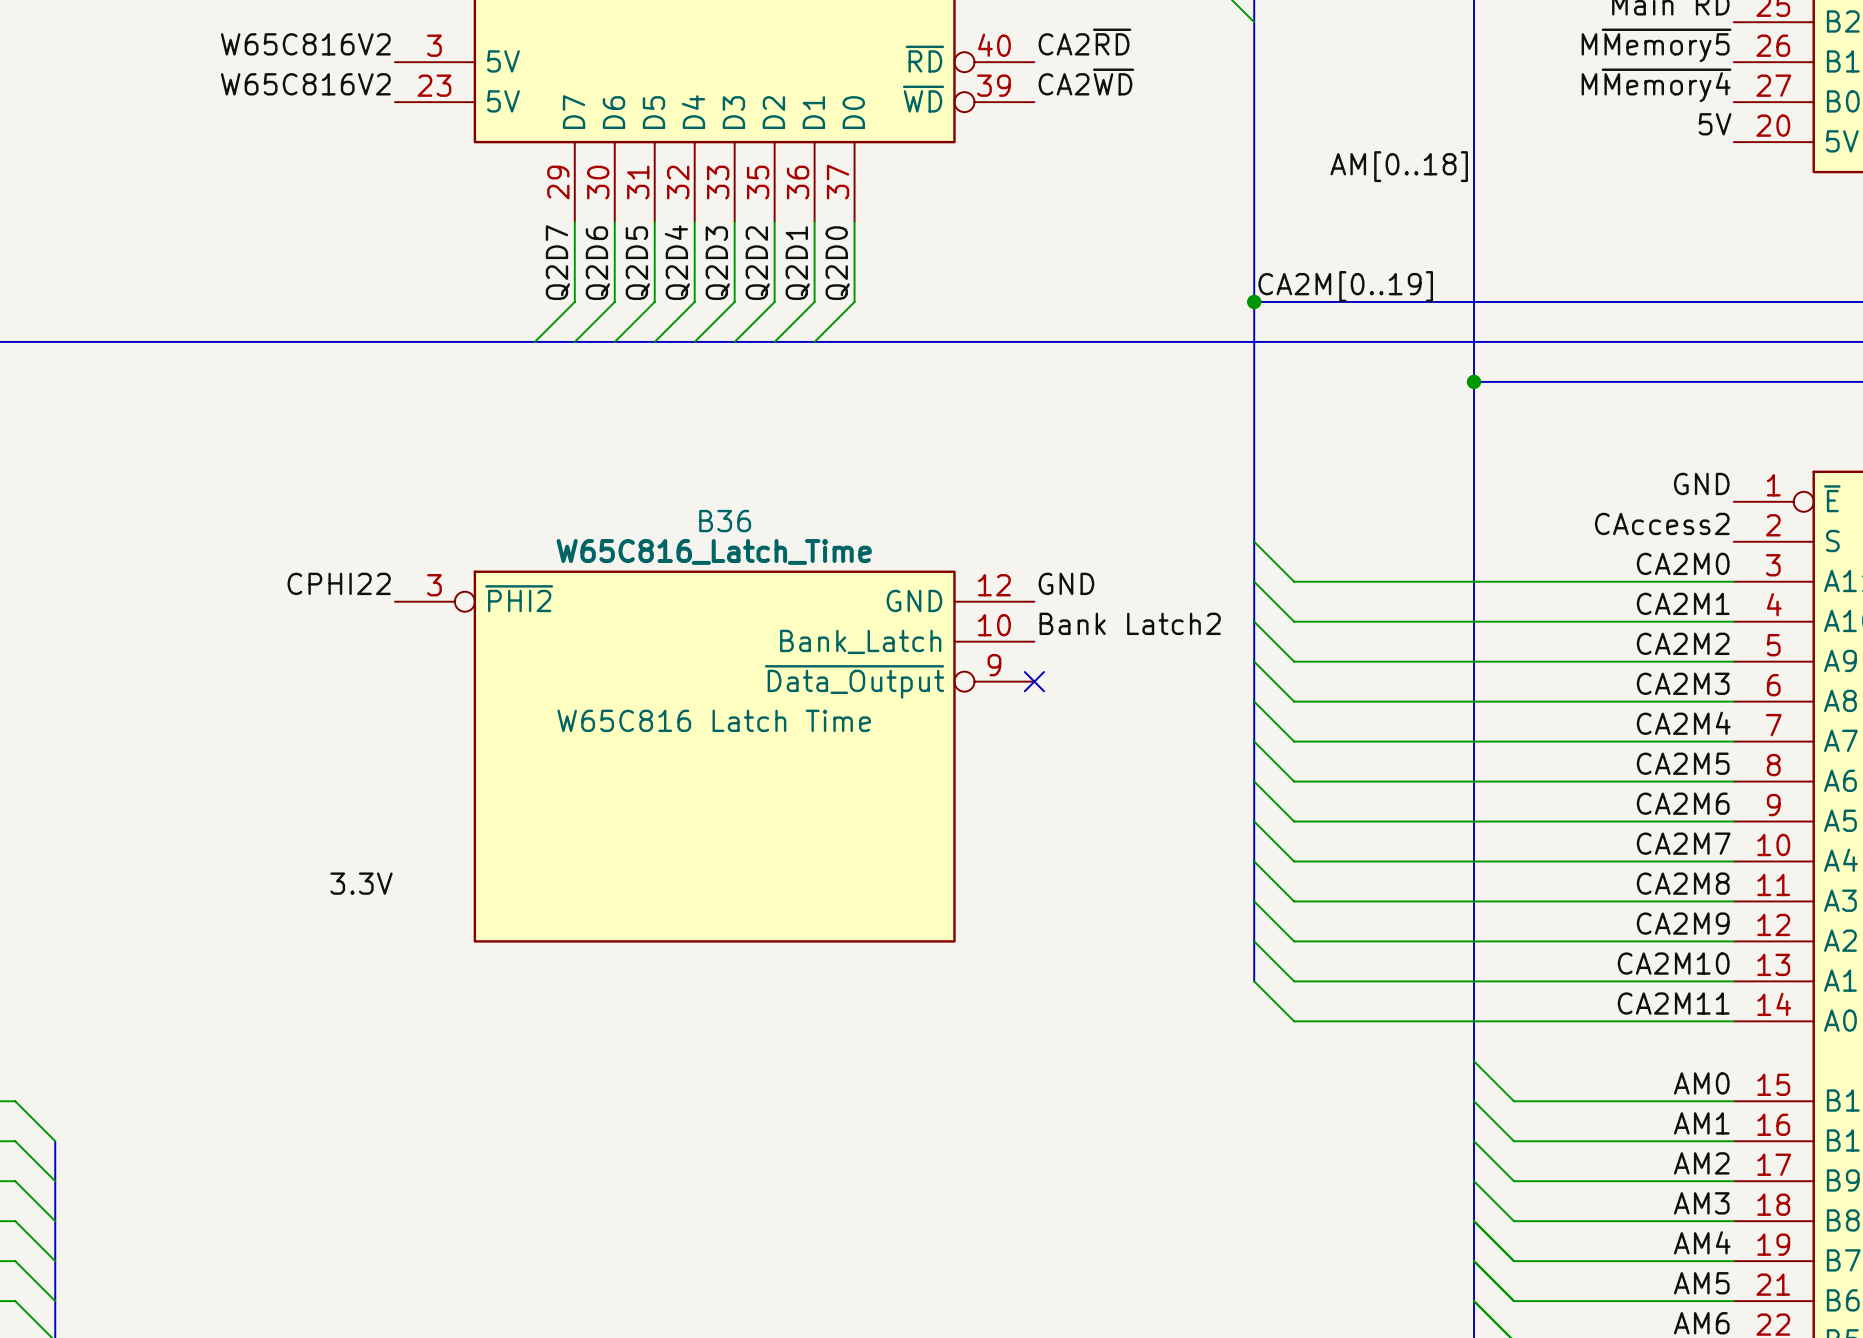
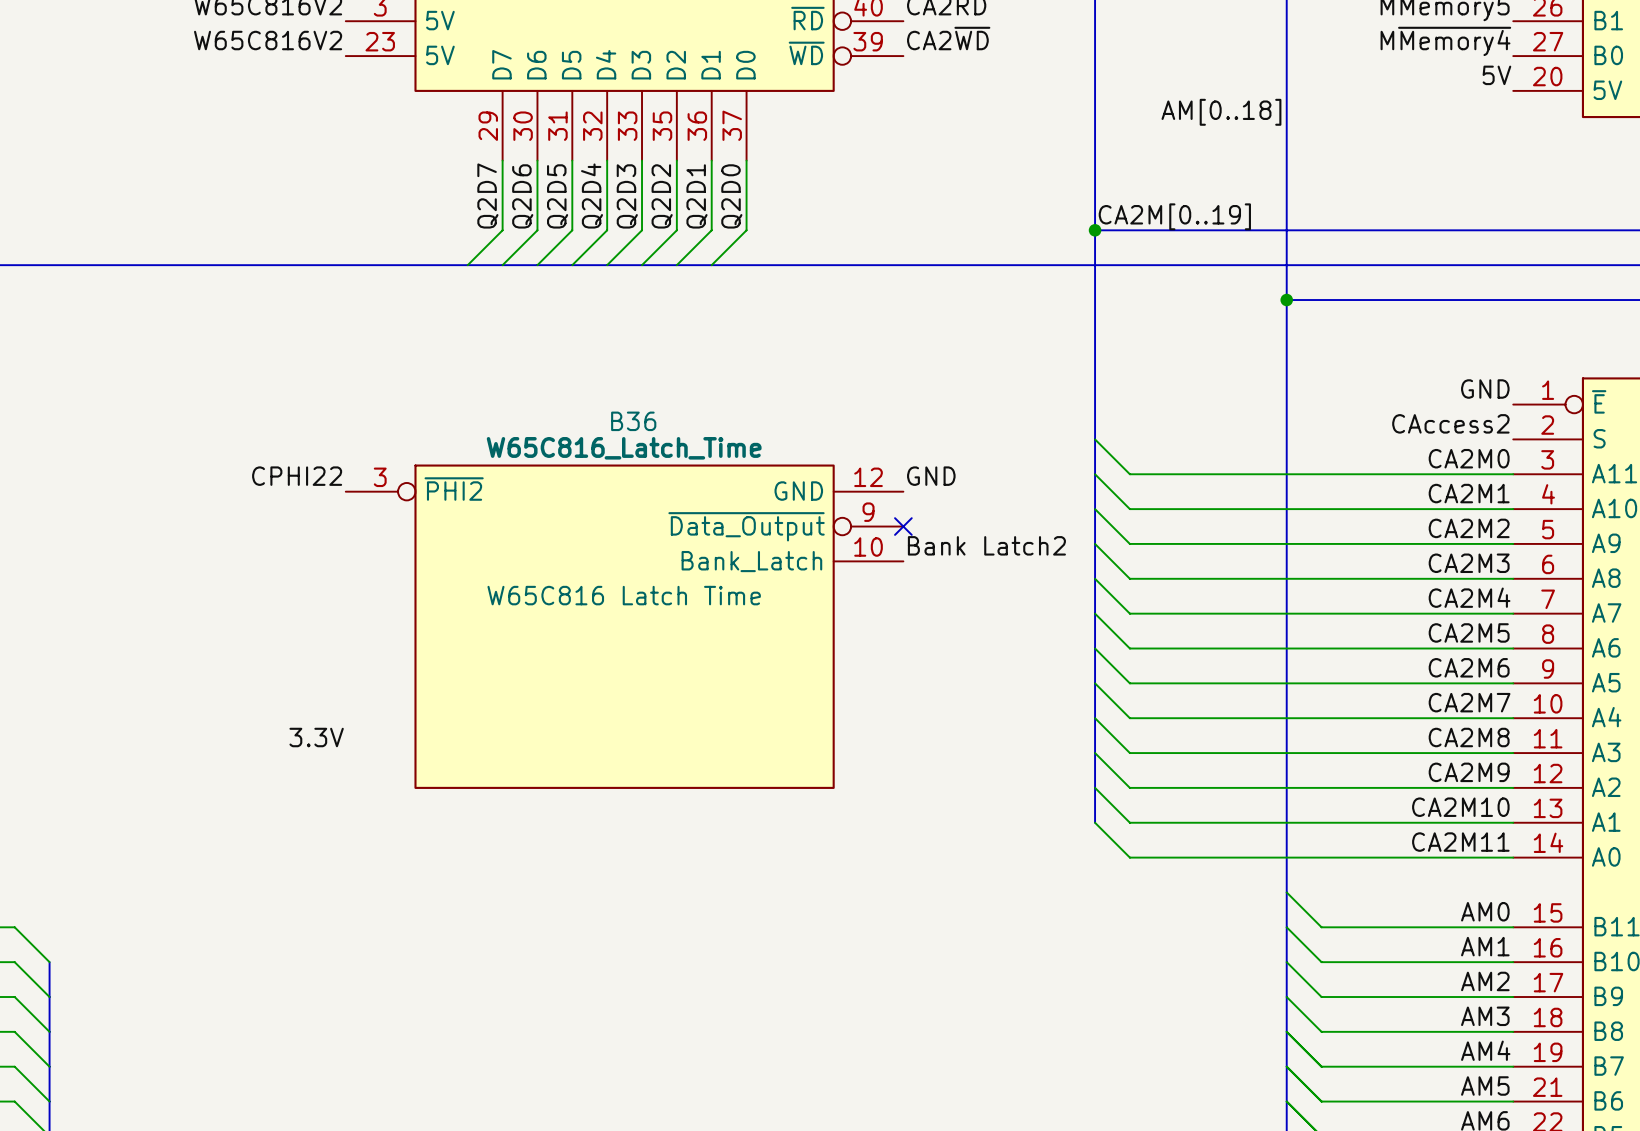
B36 symbol: [394, 570, 1035, 943] -> [345, 464, 904, 789]
label position: Bank Latch2 (1130, 623) -> Bank Latch2 (986, 545)
no-connect mark position: (1034, 681) -> (903, 526)

